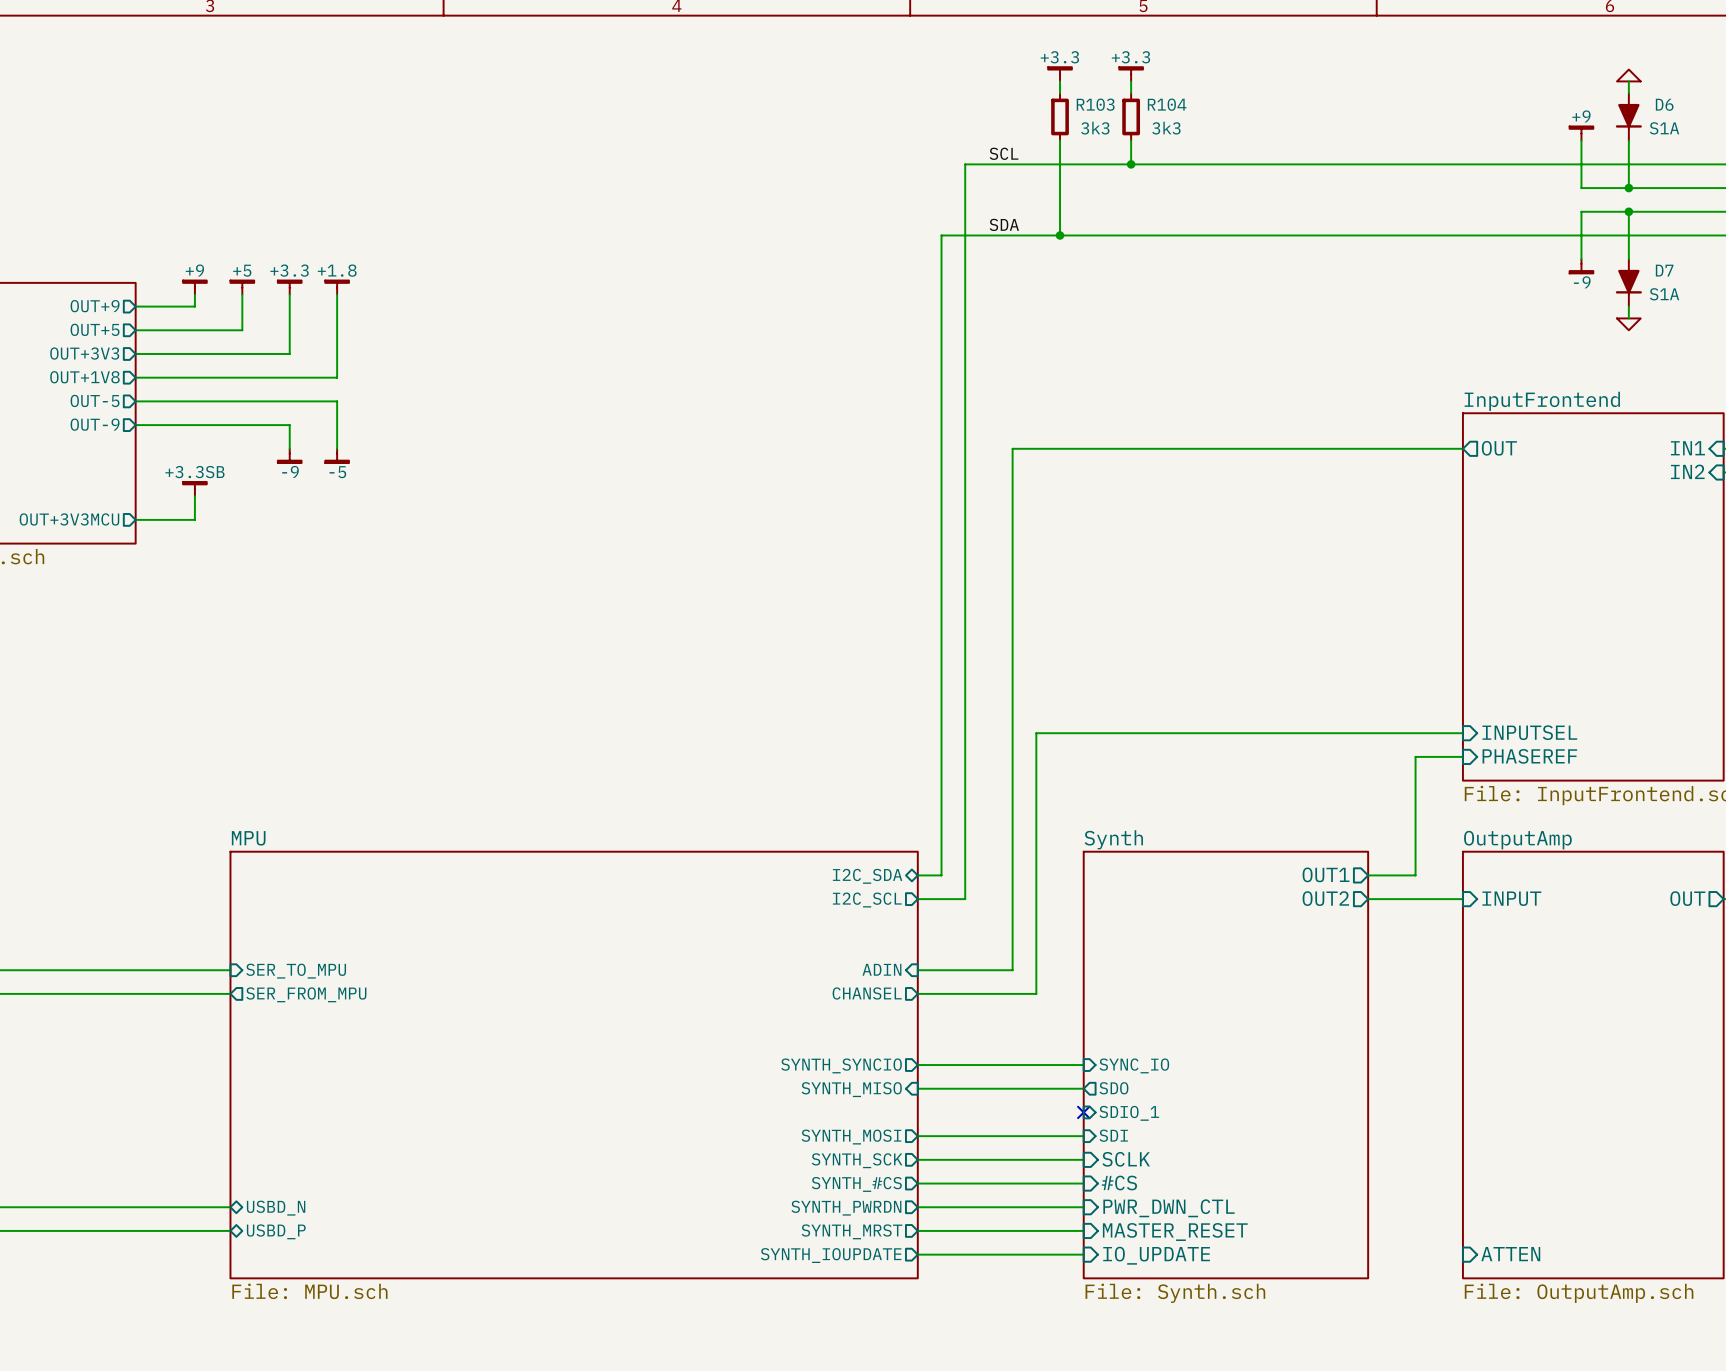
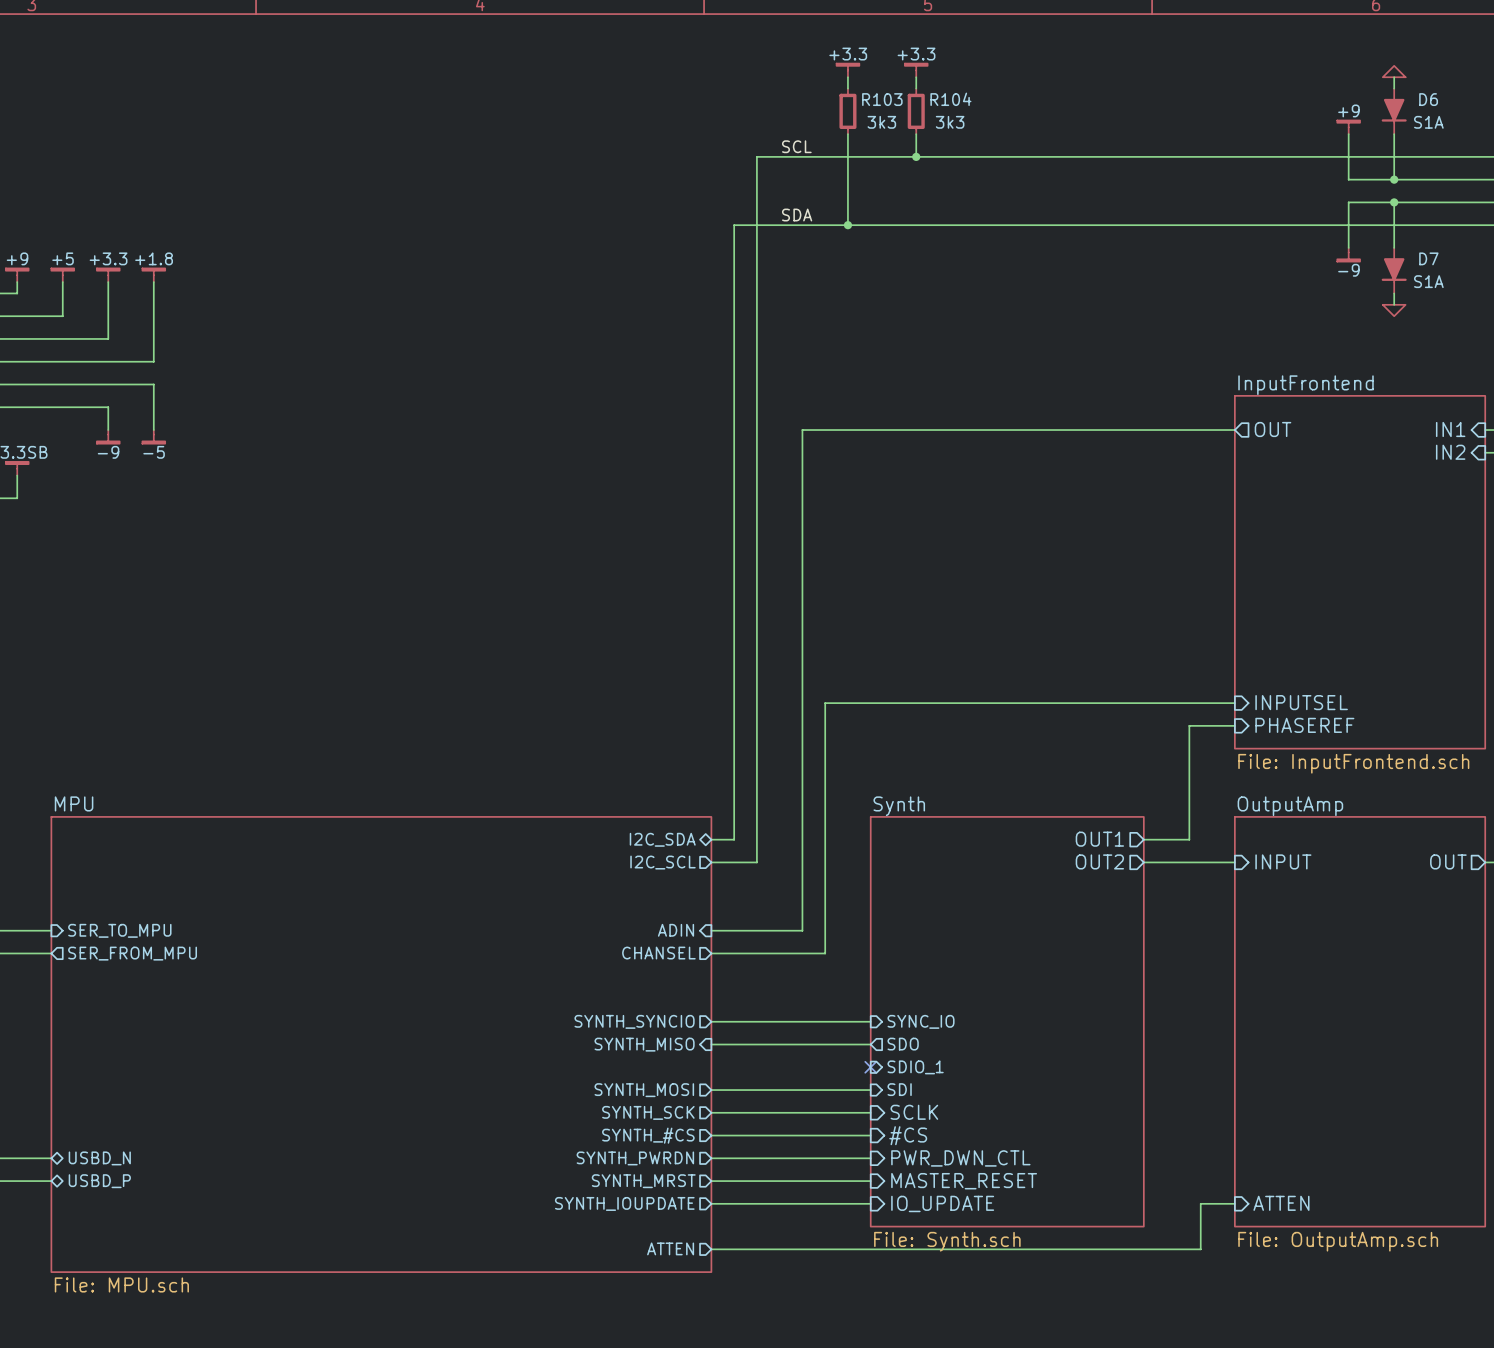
sheet MPU: File: MPU.sch (574, 1065) -> none
sheet MPU: none -> File: MPU.sch (381, 1044)
wire: none -> (1234, 1203) (1200, 1203) (1200, 1249) (711, 1249)
sheet pin: none -> ATTEN (670, 1248)

